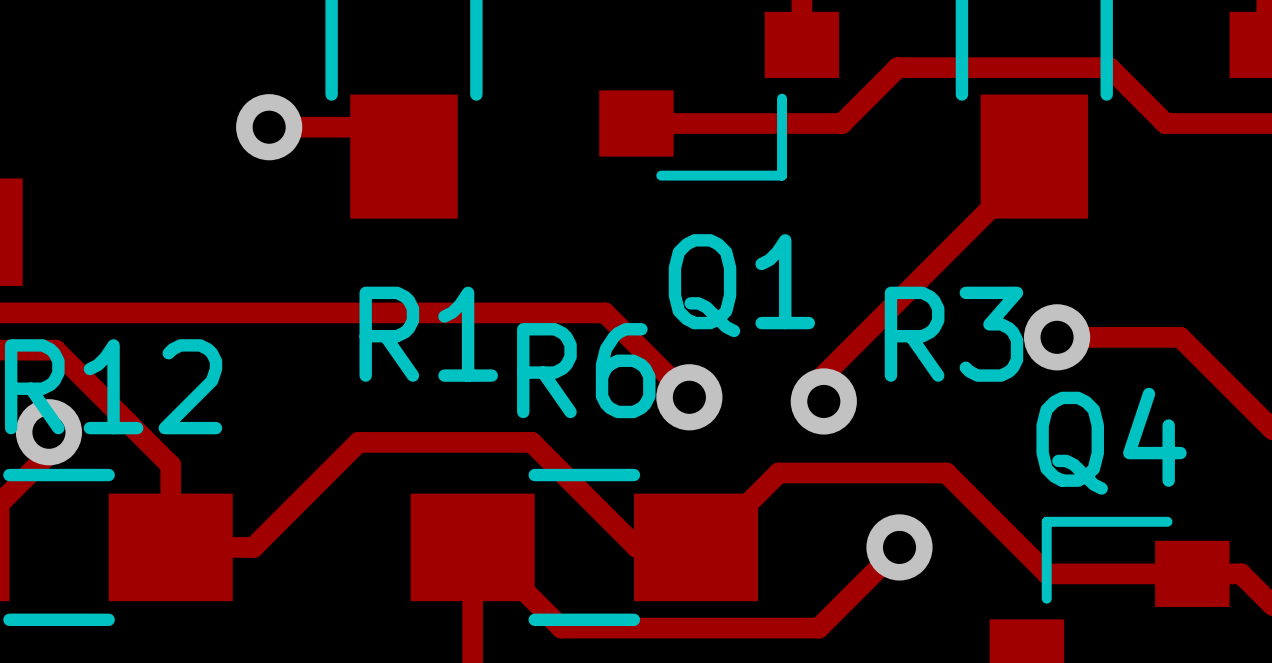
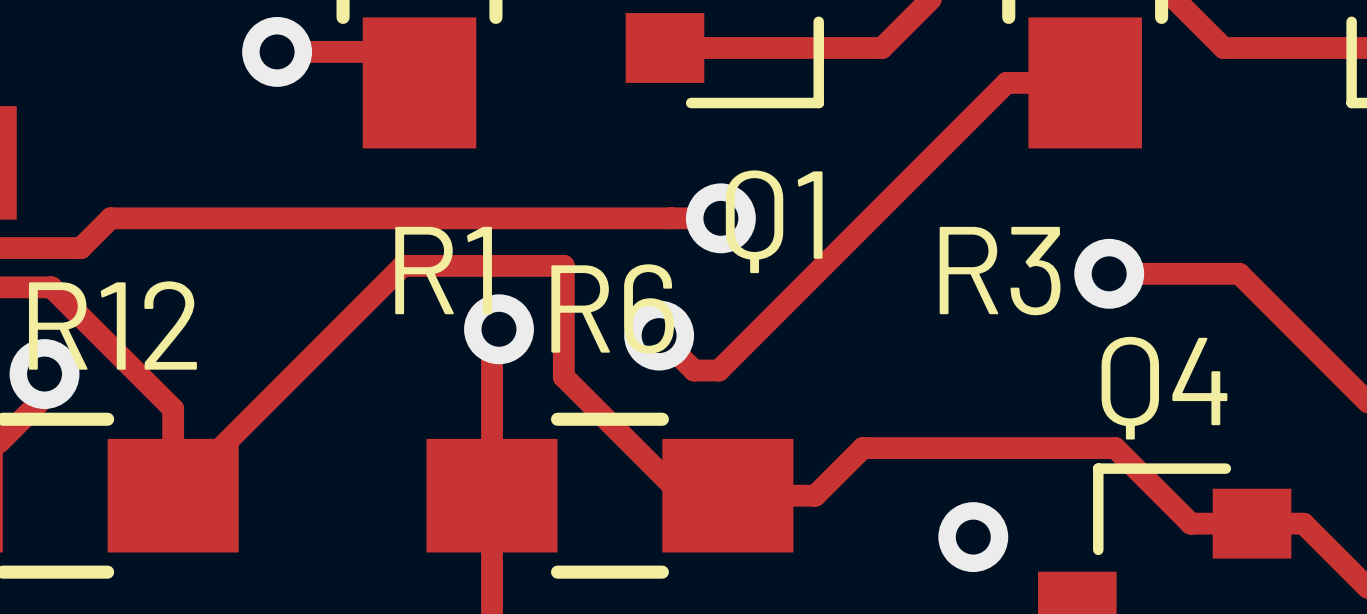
track: (1034, 156) (1034, 164) (823, 375) (823, 401) -> (1085, 82) (1006, 82) (718, 370) (694, 370) (659, 335)
via: none -> (720, 218)
track: (83, 312) (605, 312) (689, 397) -> (80, 248) (110, 218) (720, 218)
via: none -> (499, 329)
via position: (689, 397) -> (659, 335)
via: (823, 401) -> none
track: (170, 547) (253, 547) (358, 442) (531, 442) (636, 547) (653, 547) -> (173, 495) (402, 265) (563, 265) (563, 376) (682, 495)
track: (472, 547) (480, 547) (561, 628) (818, 628) (899, 547) -> (492, 495) (492, 336) (499, 329)
track: (704, 547) (778, 472) (946, 472) (1047, 573) (1134, 573) -> (736, 495) (815, 495) (862, 448) (1115, 448) (1190, 523)
via position: (899, 547) -> (973, 537)

